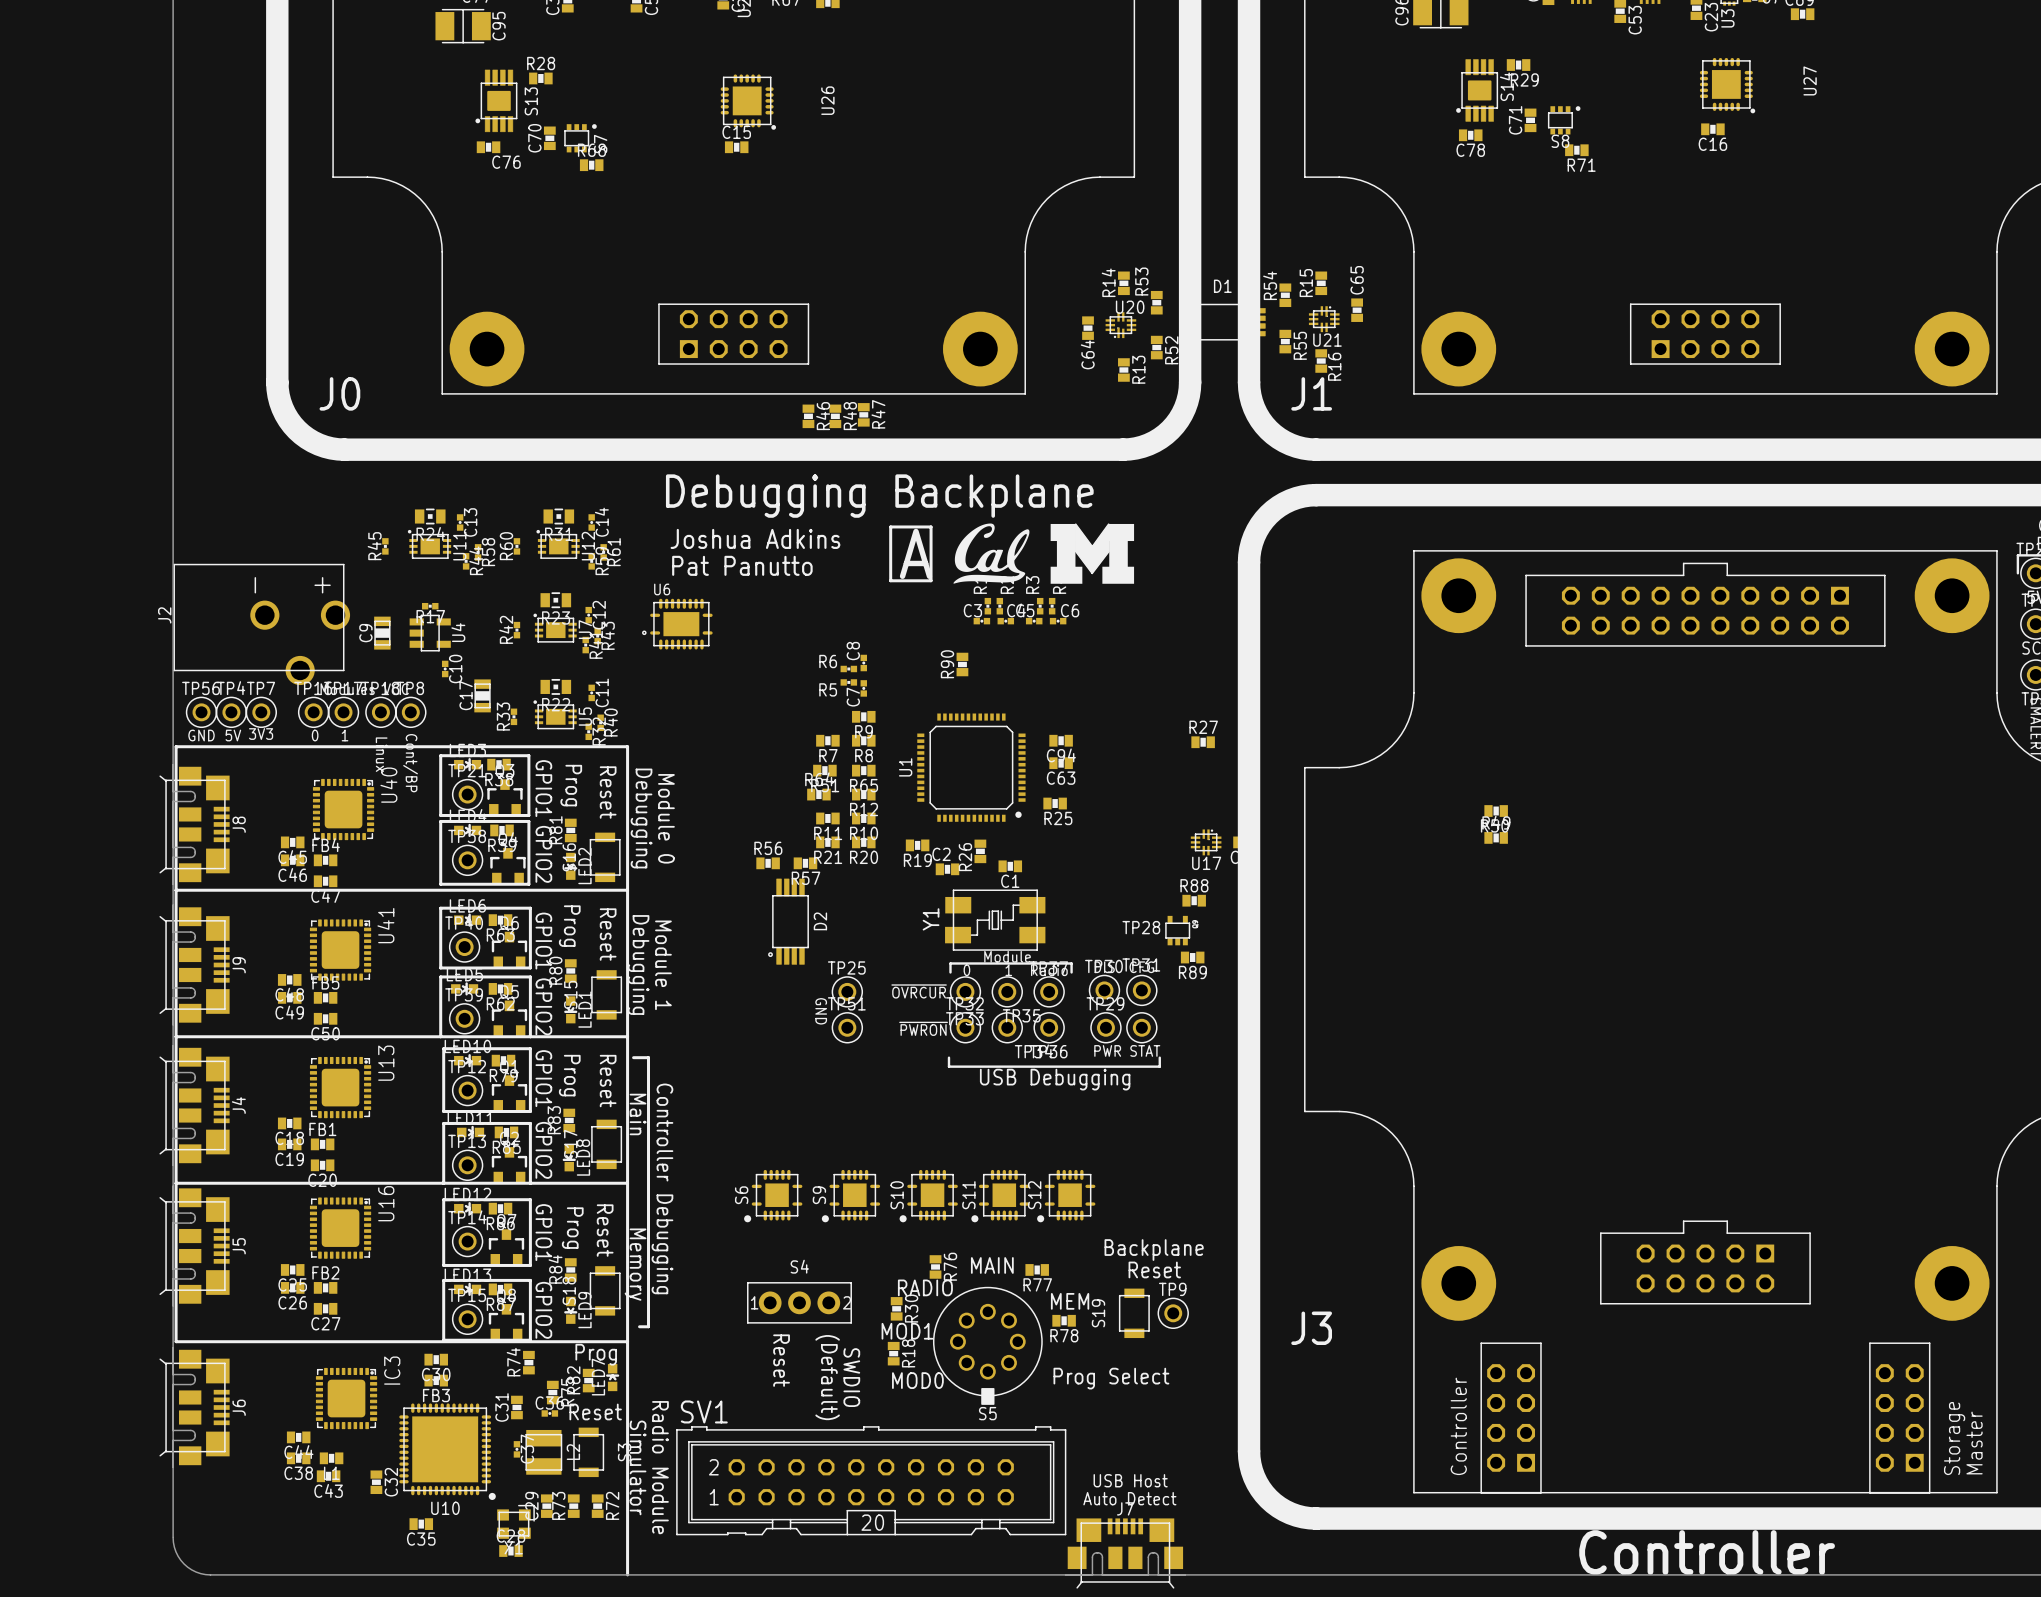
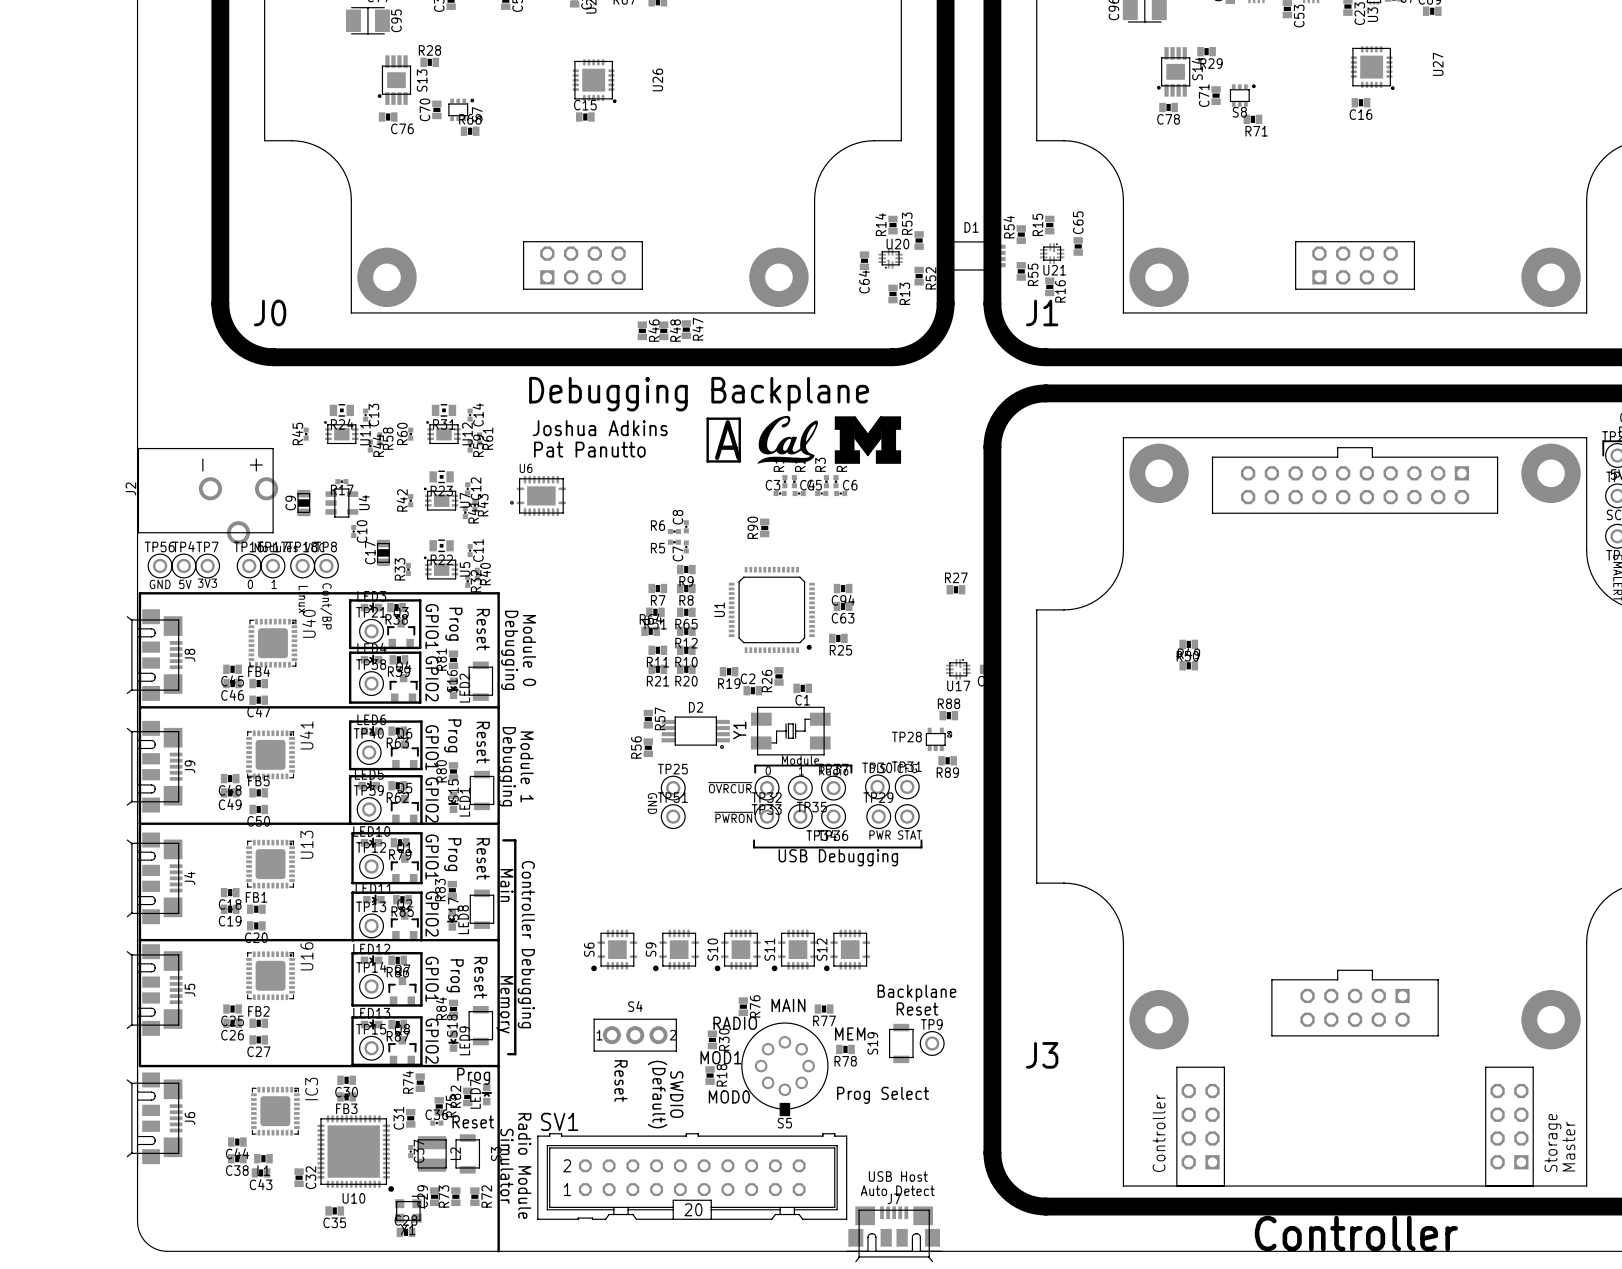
R56 rotation: 0° (768, 863) -> 90° clockwise (648, 747)
R56 position: (768, 863) -> (648, 747)
R57 rotation: 0° (805, 863) -> 90° clockwise (648, 719)
R57 position: (805, 863) -> (648, 719)
D2 rotation: 0° (788, 921) -> 90° counterclockwise (695, 732)
D2 position: (788, 921) -> (695, 732)

